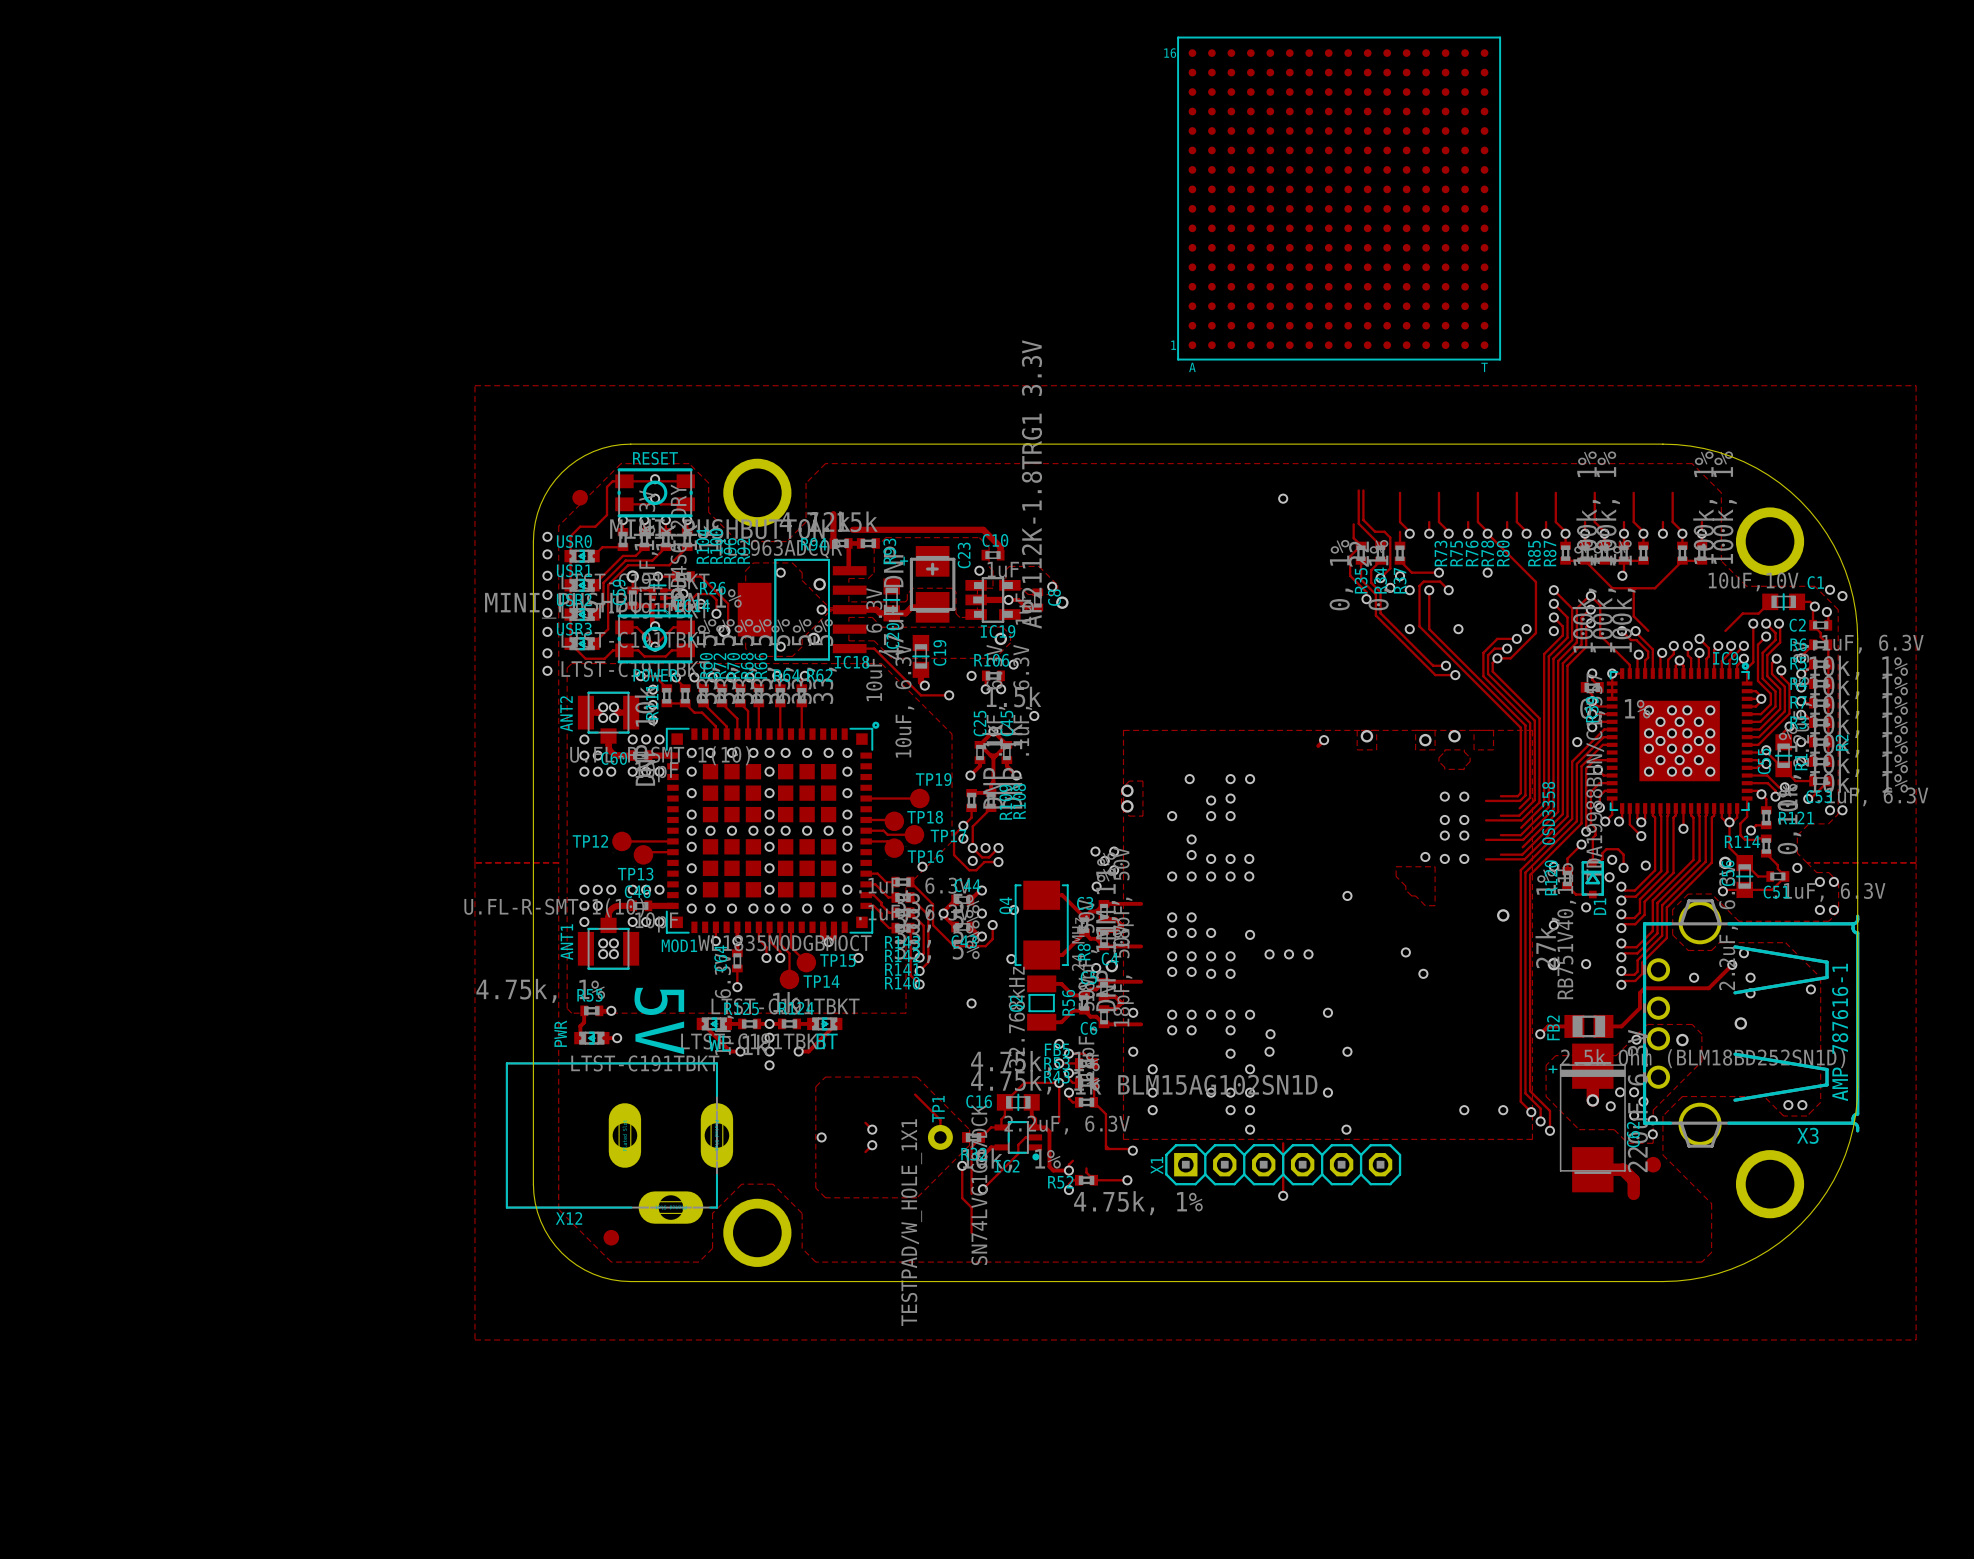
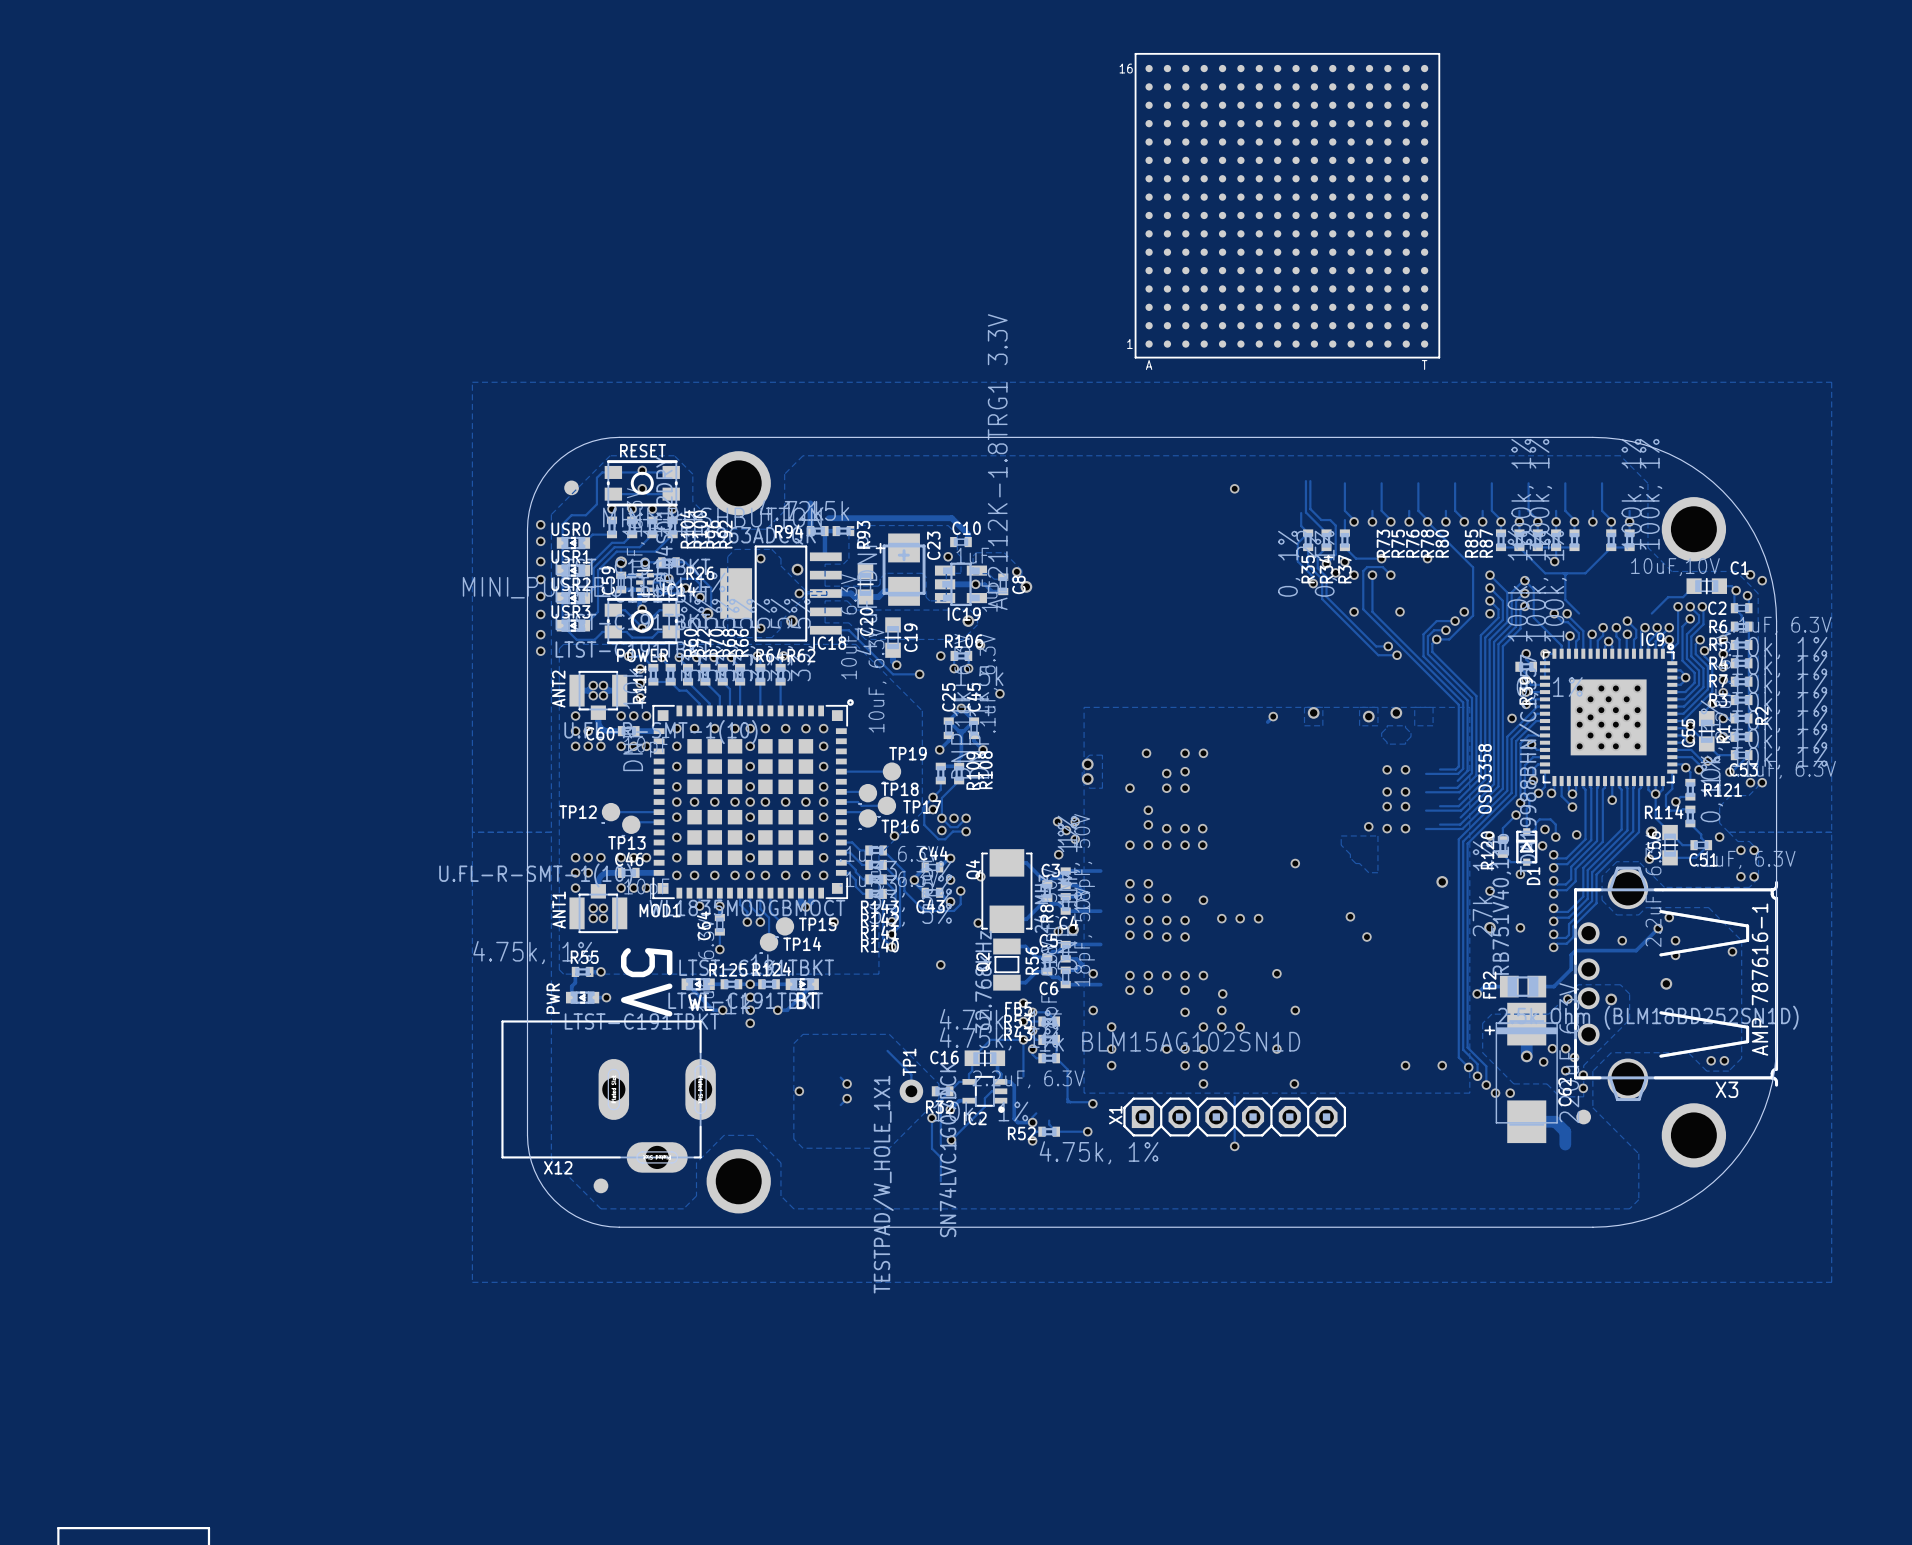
via: none -> (1221, 1027)
via: none -> (1240, 1027)
via: none -> (1495, 1093)
via: none -> (1510, 1093)

